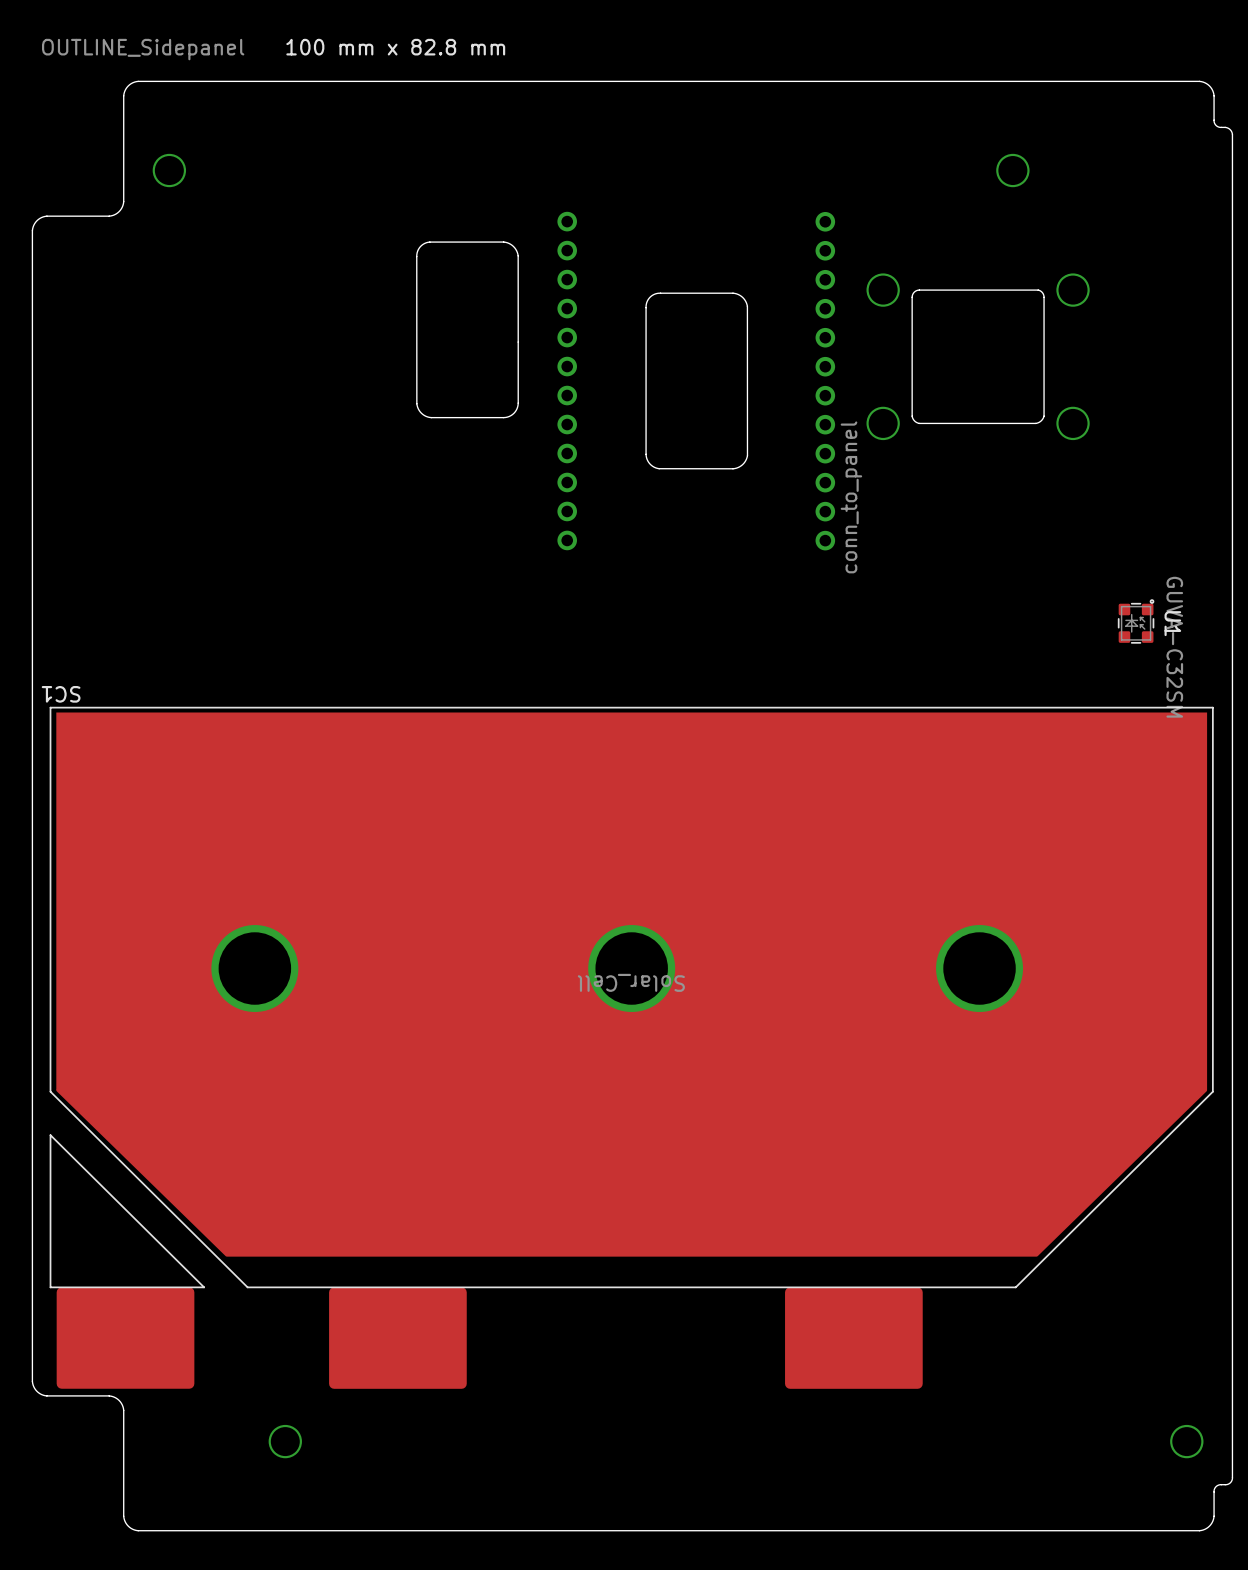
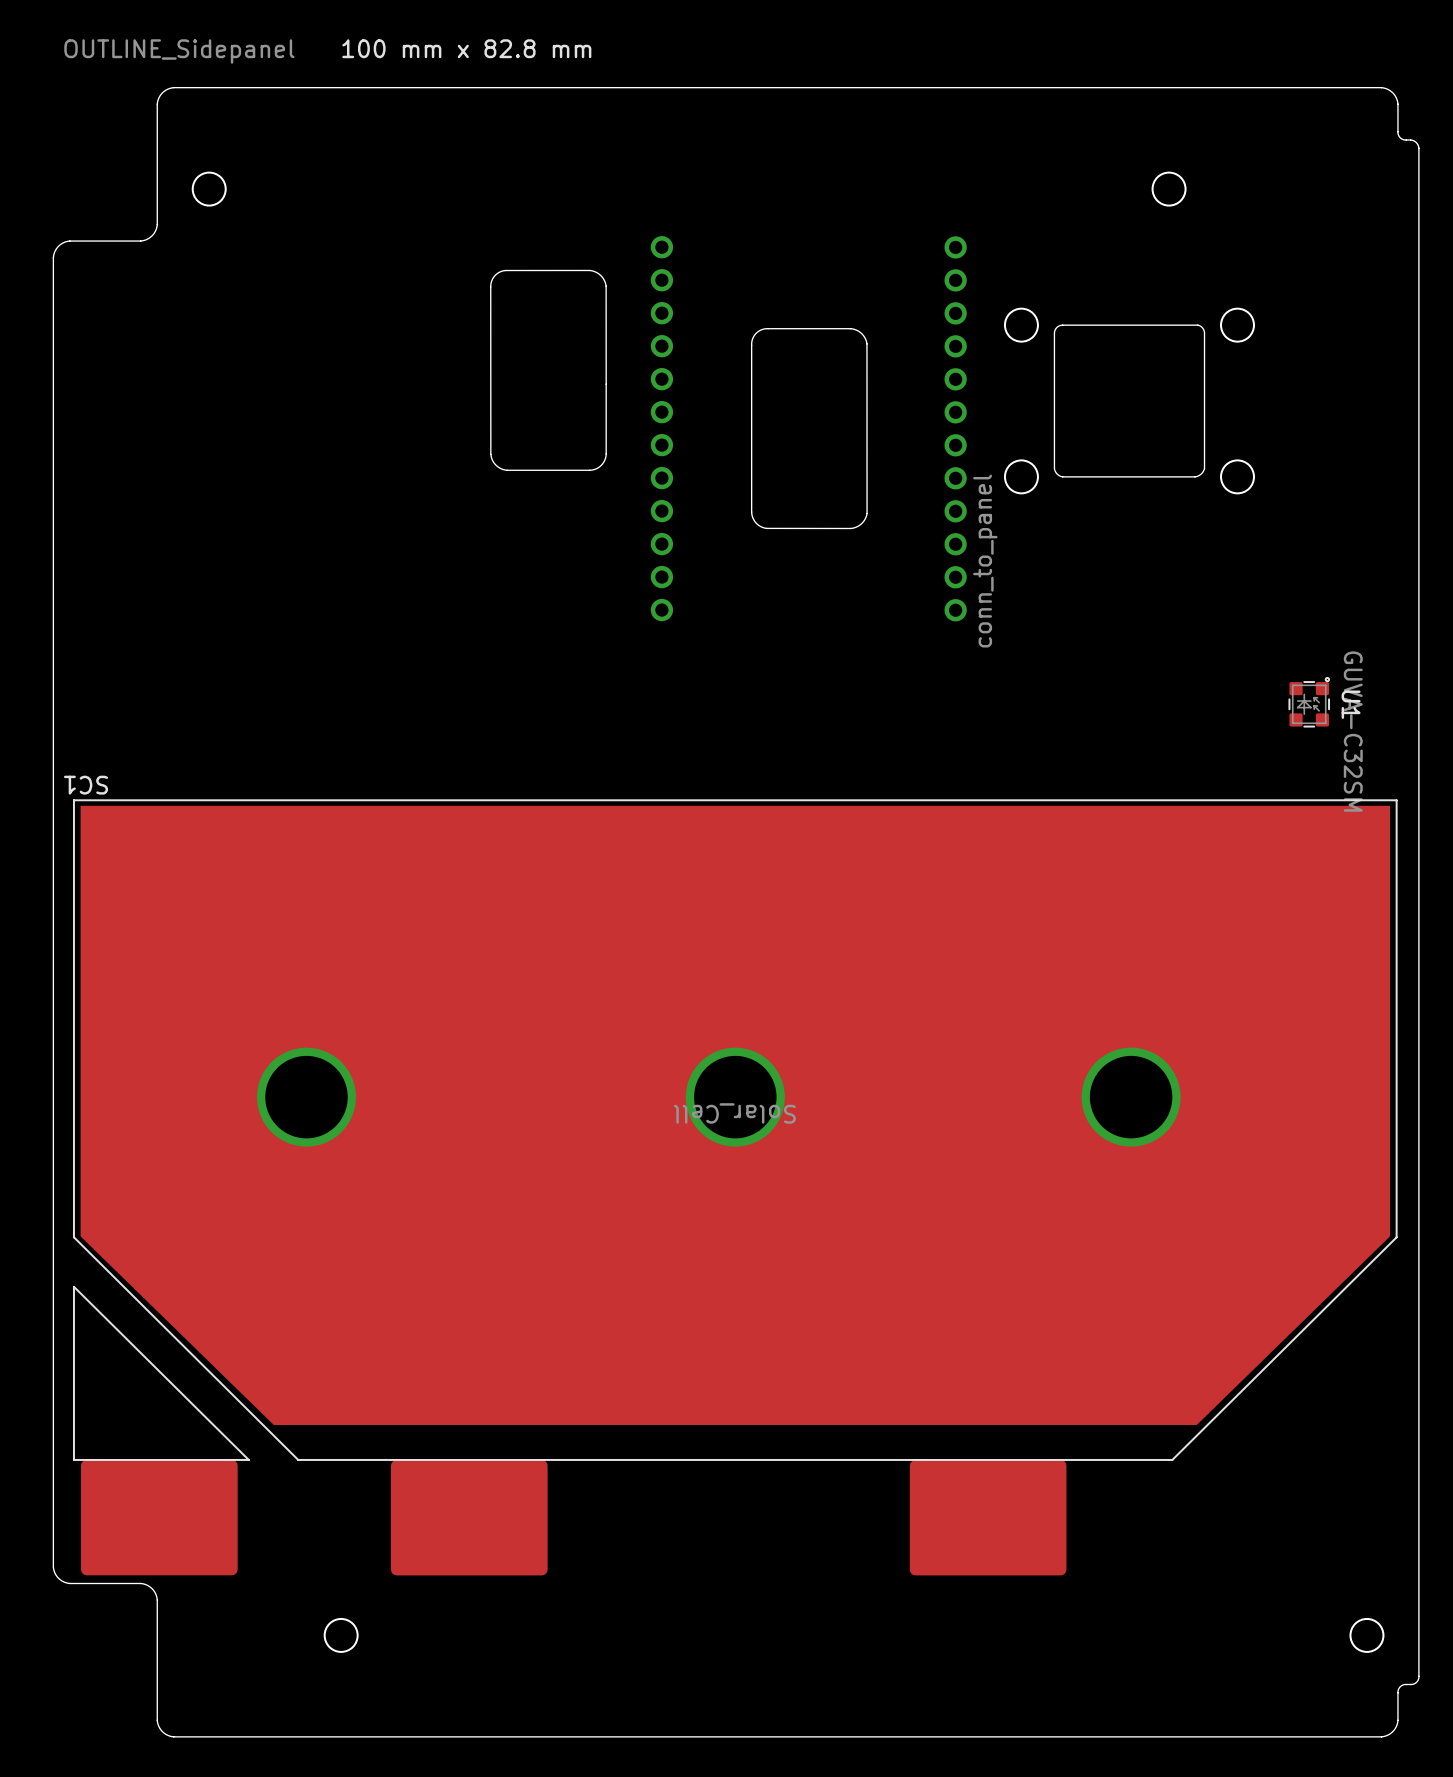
drawing: none -> [52, 87, 1420, 1738]
part: OUTLINE_Sidepanel (632, 806) -> none

